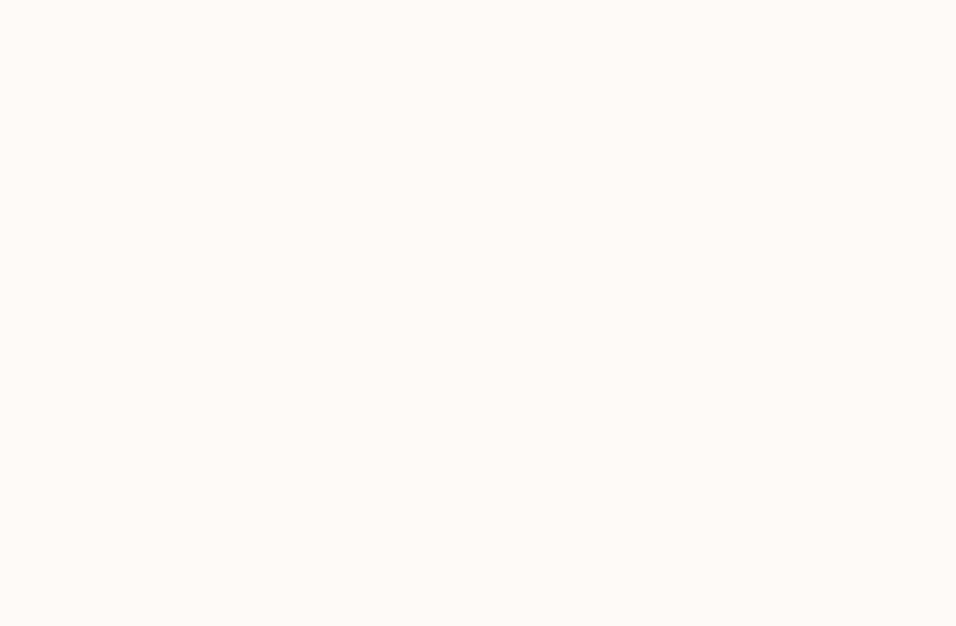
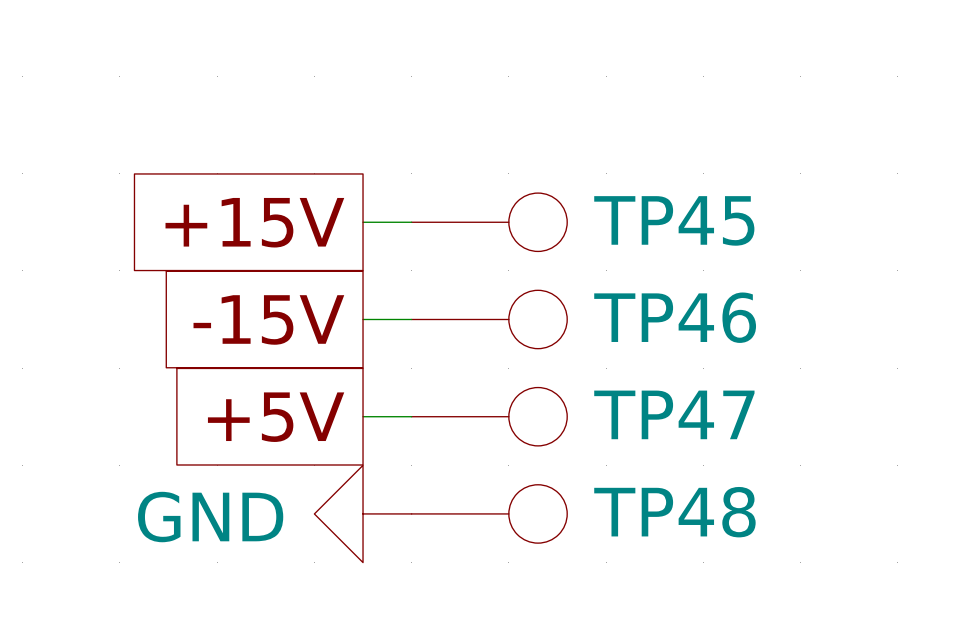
global label: none -> +15V (254, 222)
wire: none -> (363, 222) (411, 222)
TP45: none -> (489, 222)
global label: none -> -15V (268, 319)
wire: none -> (363, 319) (411, 319)
TP46: none -> (489, 319)
global label: none -> +5V (276, 417)
wire: none -> (363, 416) (411, 416)
TP47: none -> (489, 416)
power symbol: none -> GND (363, 513)
TP48: none -> (489, 513)

